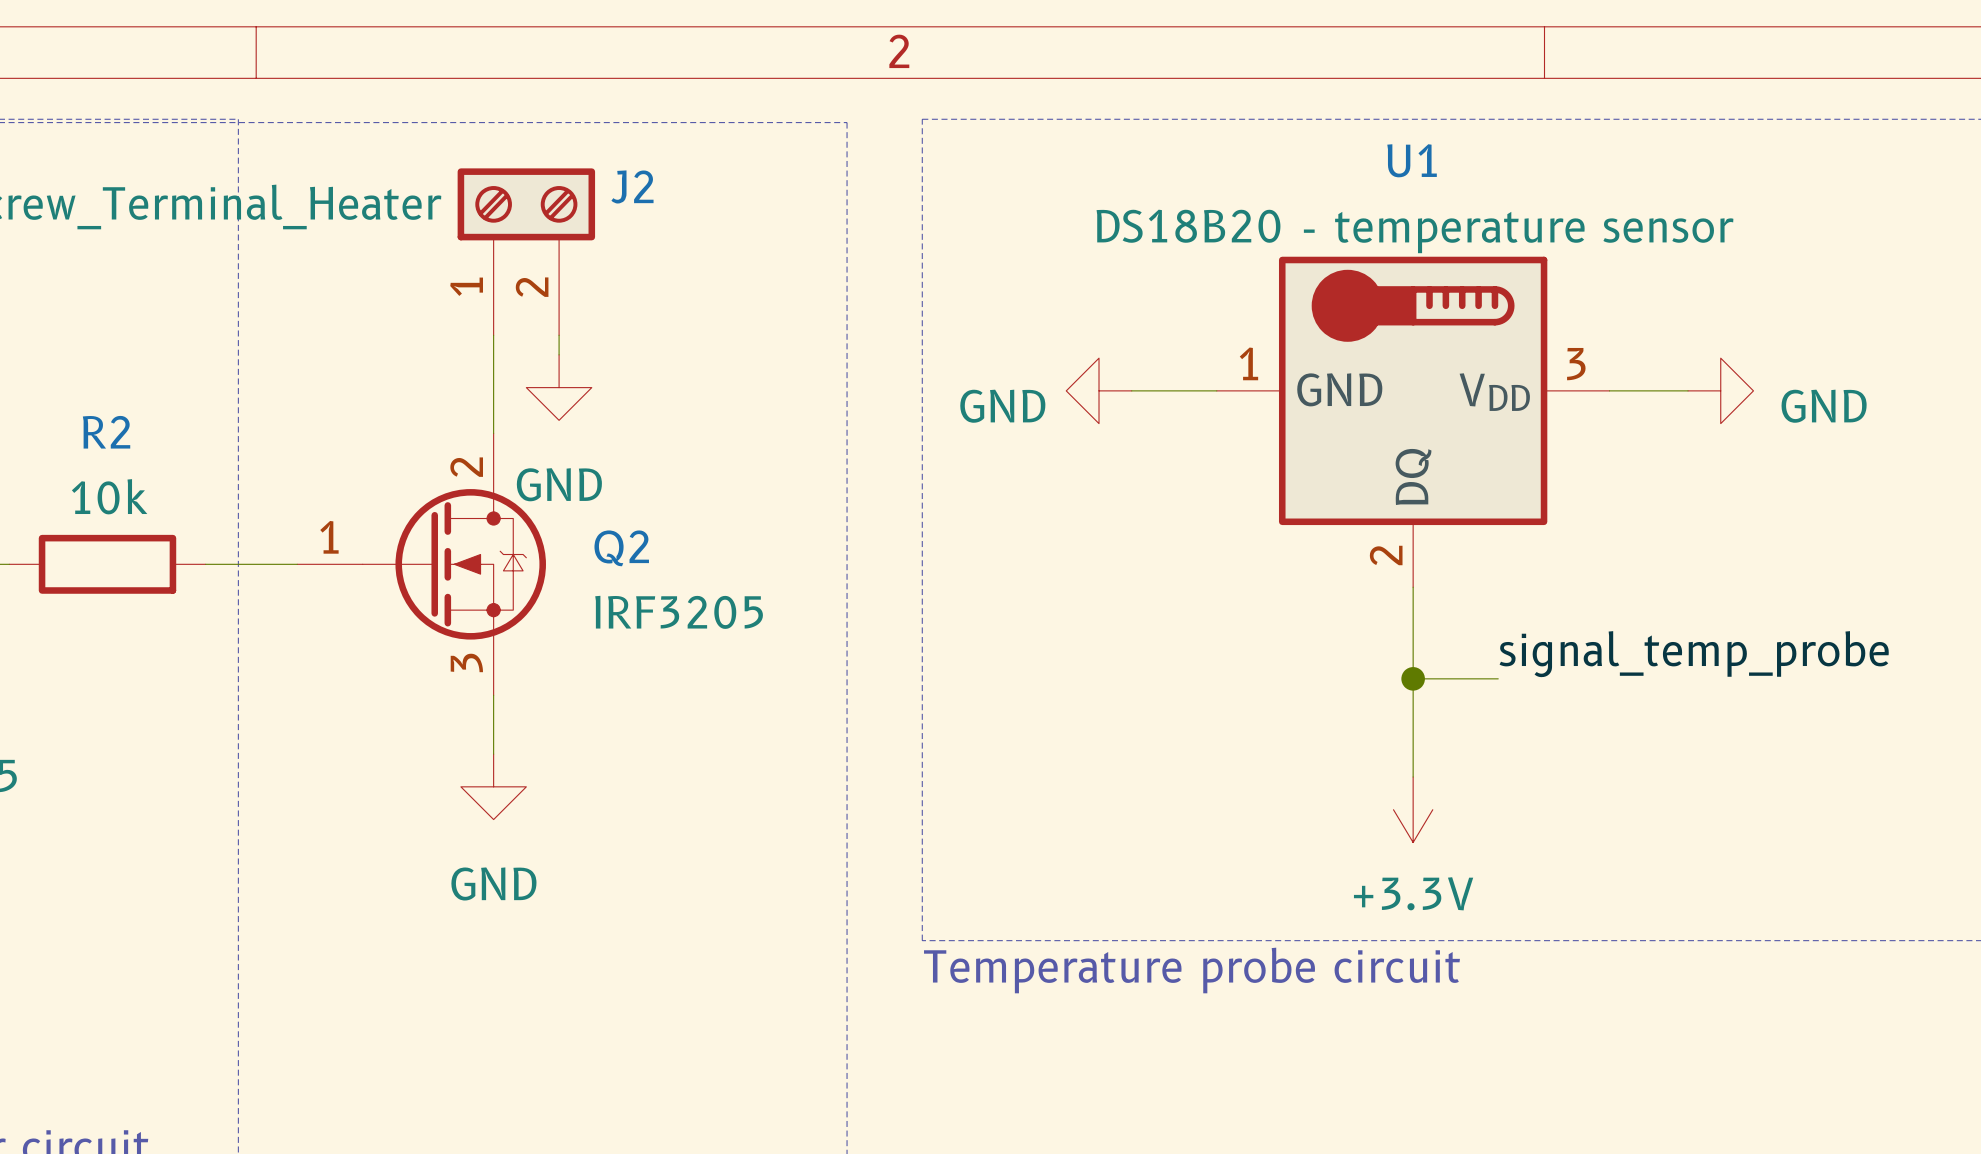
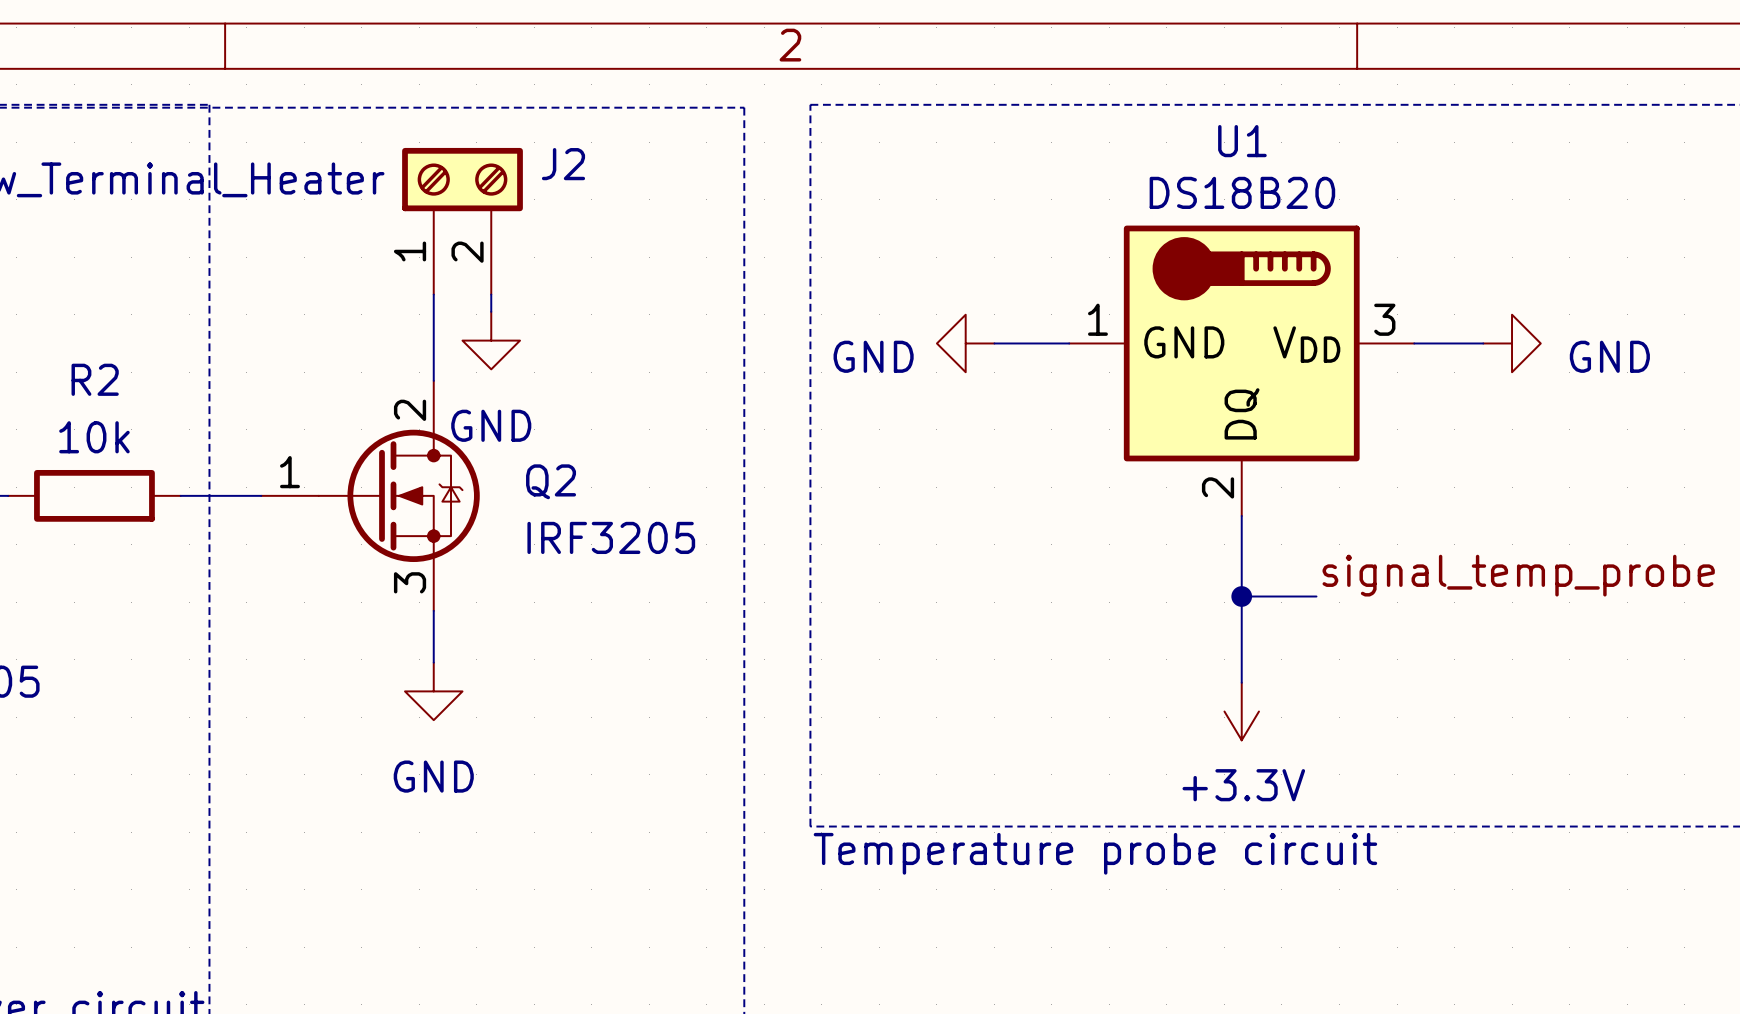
U1 value: DS18B20 - temperature sensor (1414, 231) -> DS18B20 (1242, 192)

